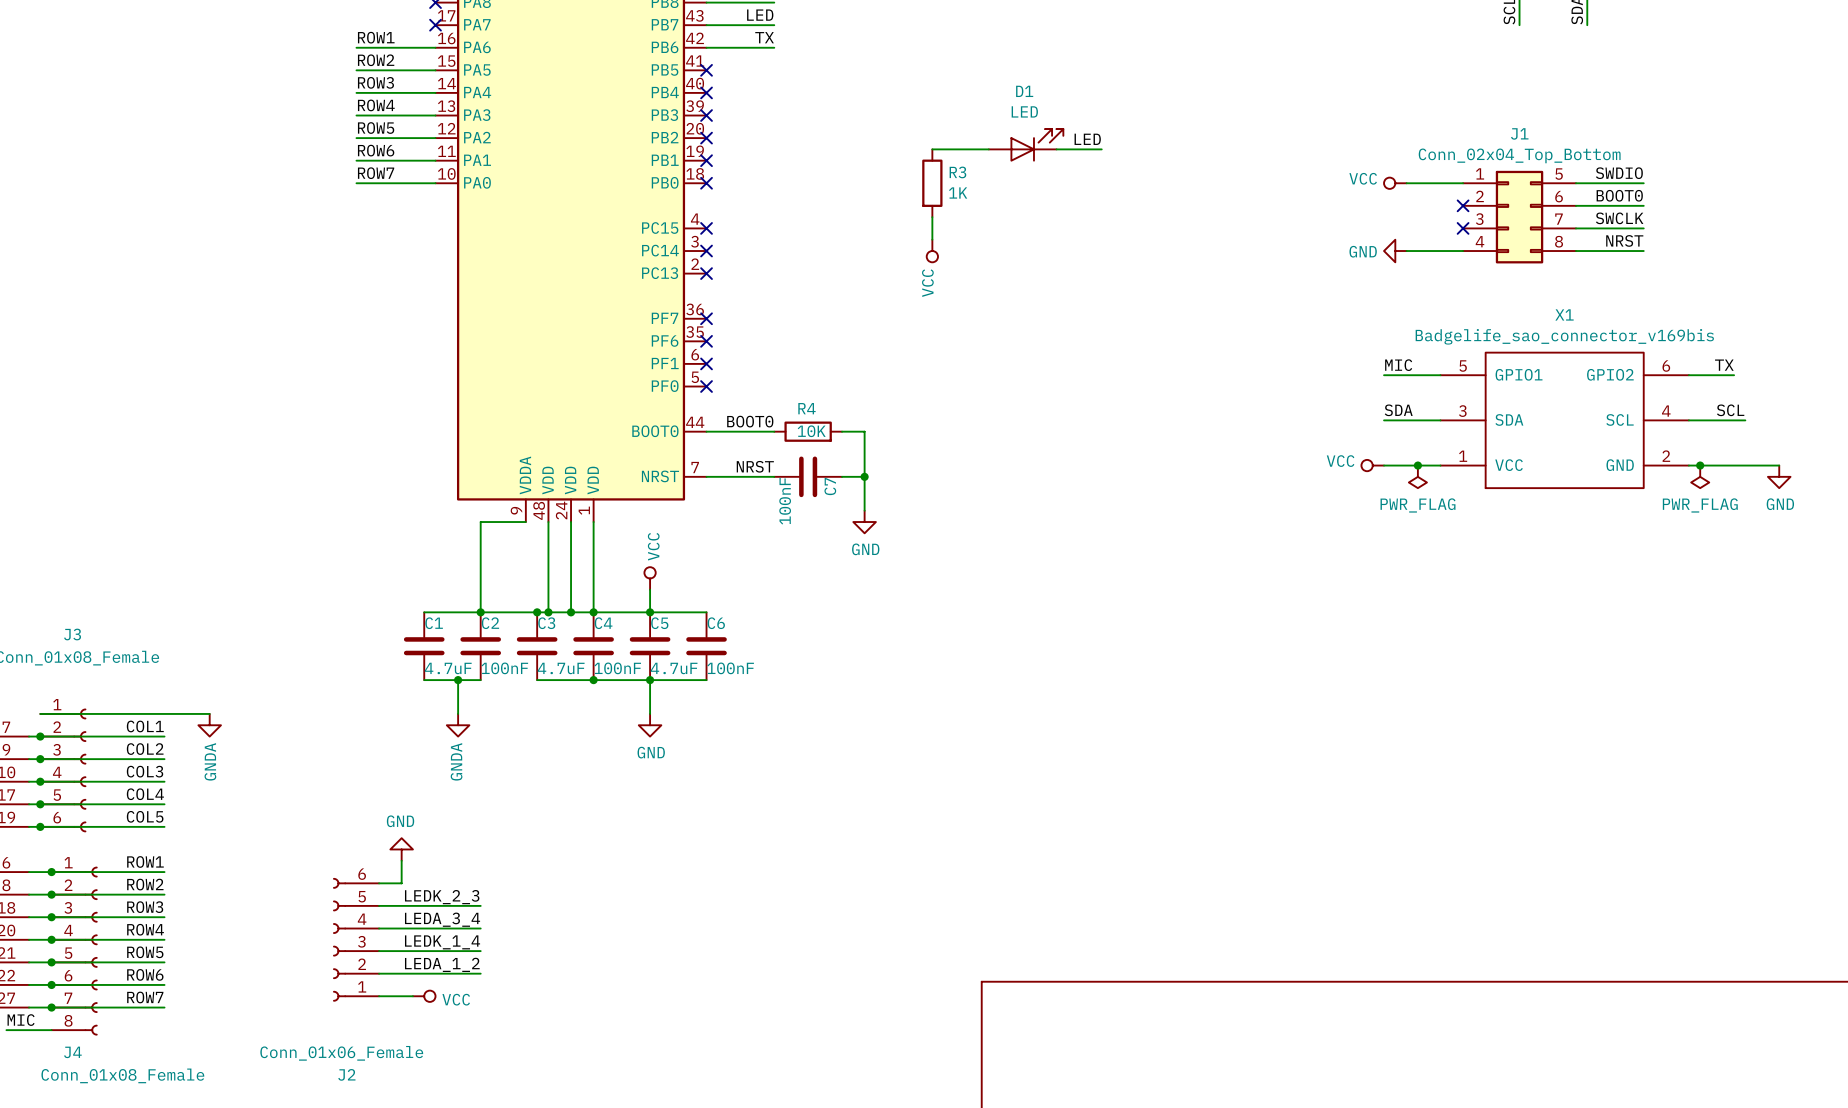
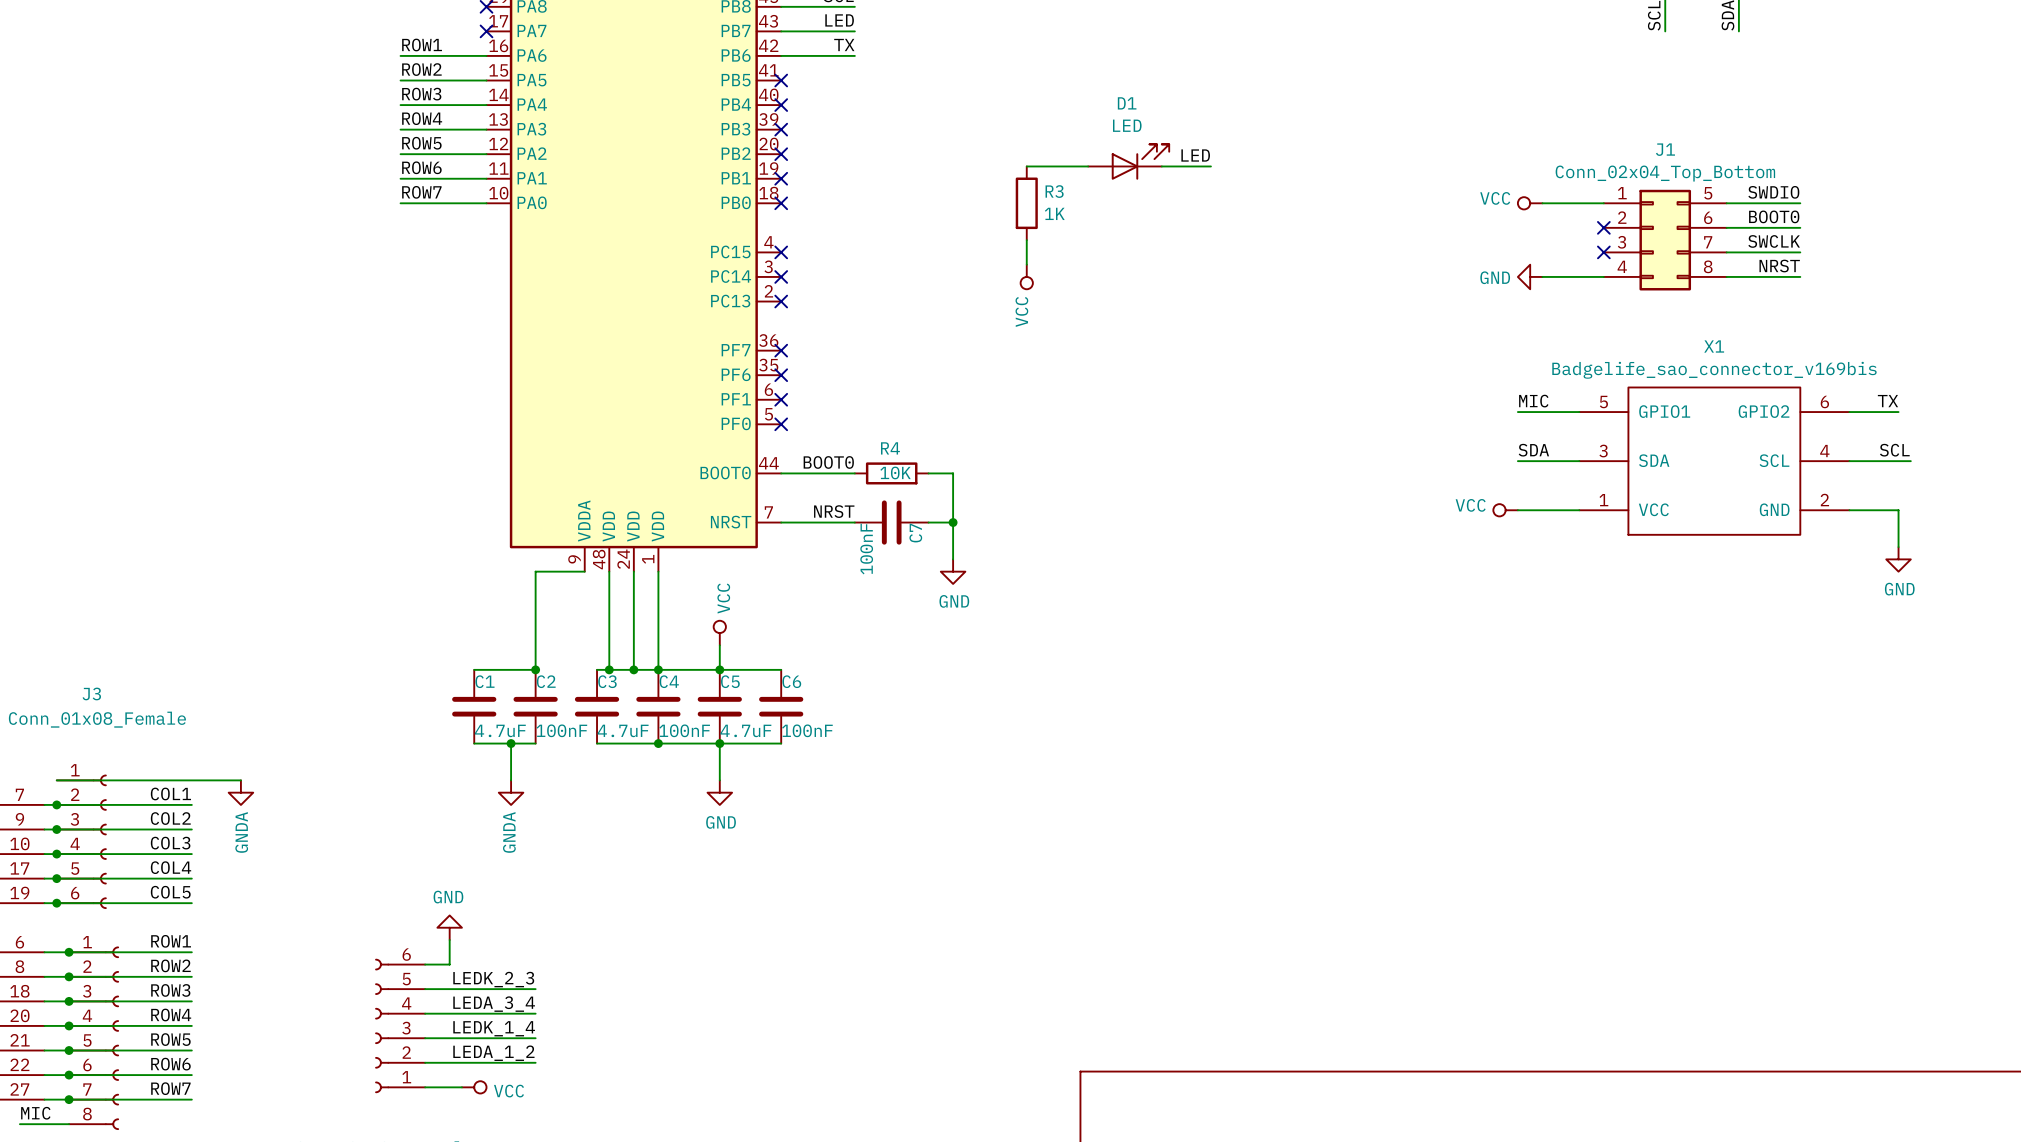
junction: (1417, 465) -> none
junction: (1700, 465) -> none
wire: (1734, 465) (1779, 465) -> (1898, 510) (1898, 547)
power symbol: PWR_FLAG (1417, 476) -> none
power symbol: PWR_FLAG (1700, 476) -> none
power symbol position: GND (1779, 476) -> GND (1898, 559)
wire: (480, 612) (537, 612) -> none
junction: (537, 612) -> none

